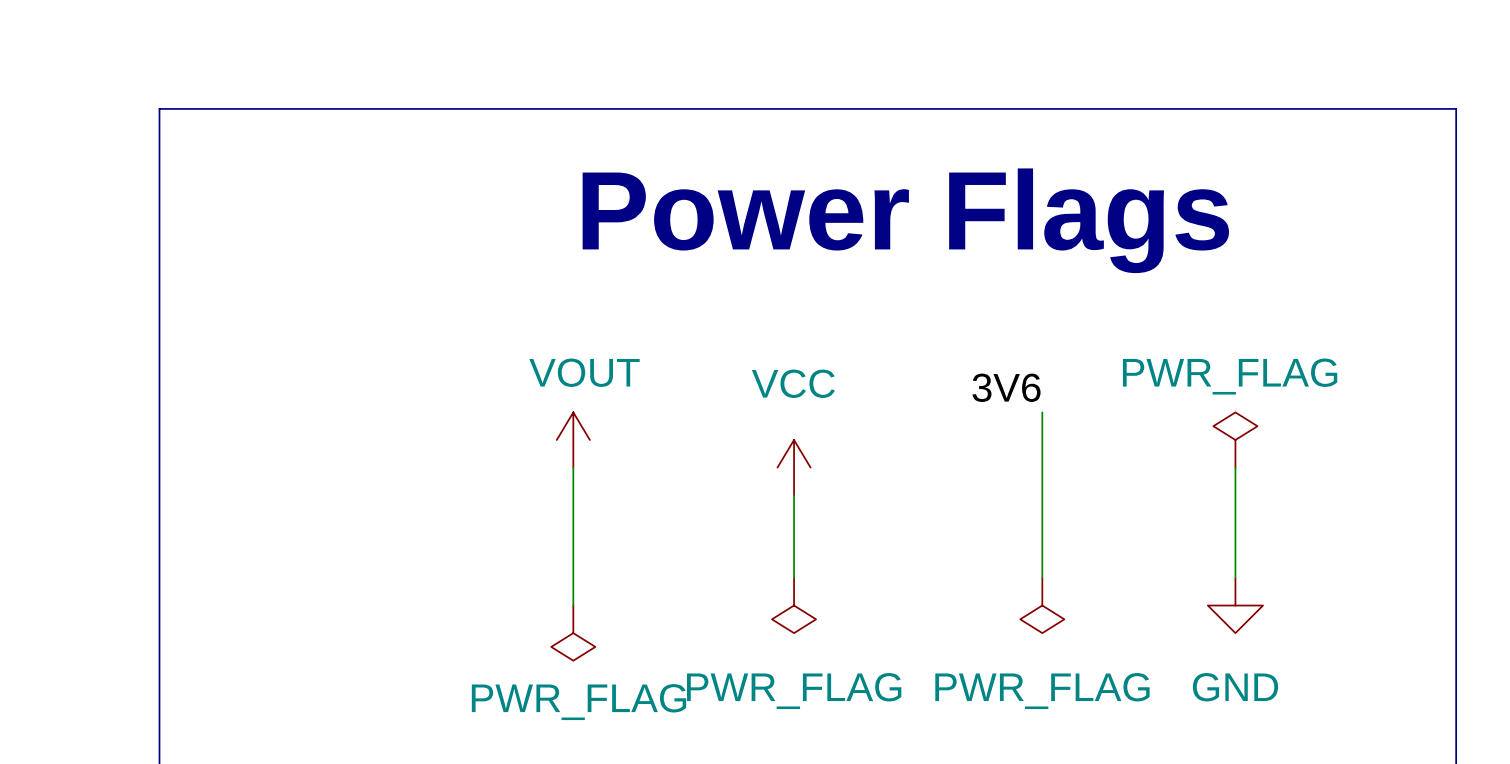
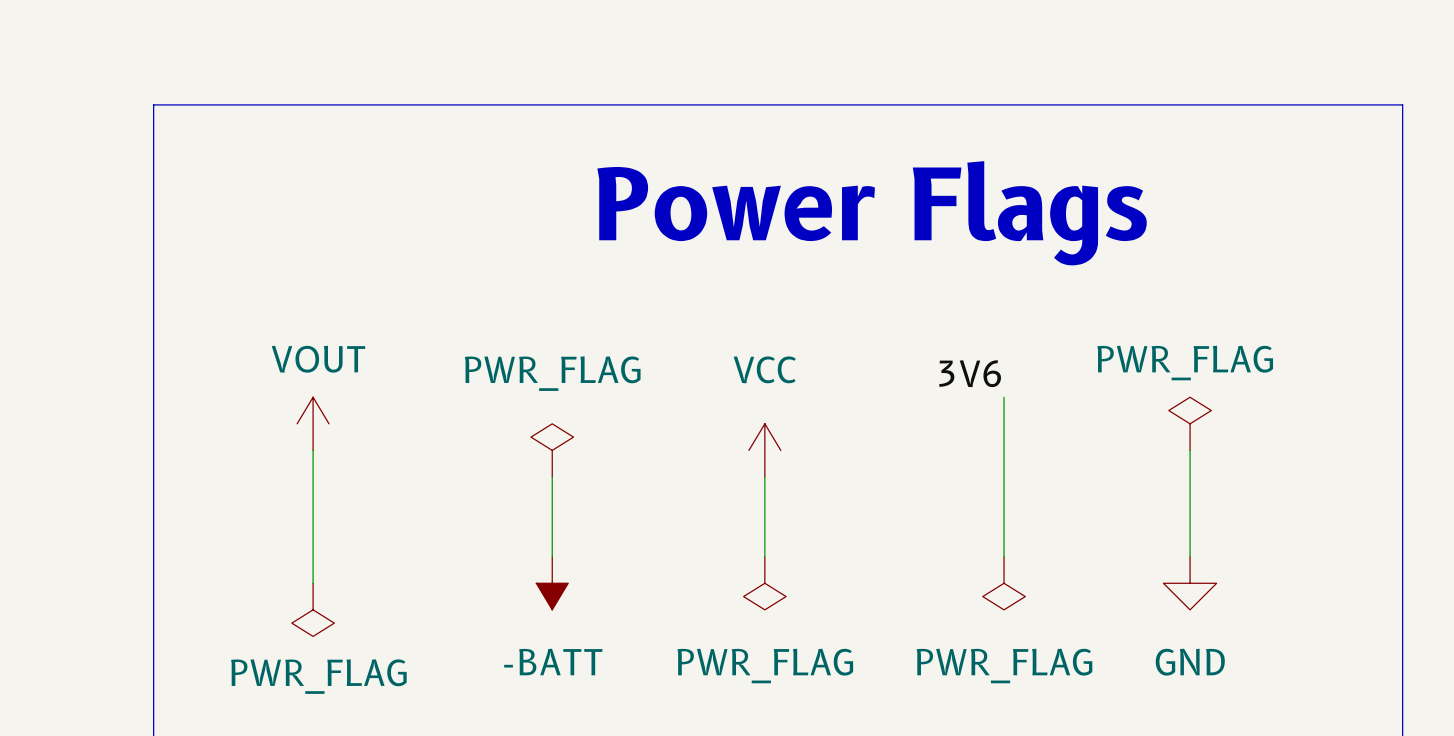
power symbol position: VOUT (573, 440) -> VOUT (313, 423)
wire: none -> (313, 450) (313, 583)
power symbol: none -> PWR_FLAG (552, 450)
power symbol: none -> -BATT (552, 583)
power symbol: none -> PWR_FLAG (313, 609)
power symbol: PWR_FLAG (573, 633) -> none

